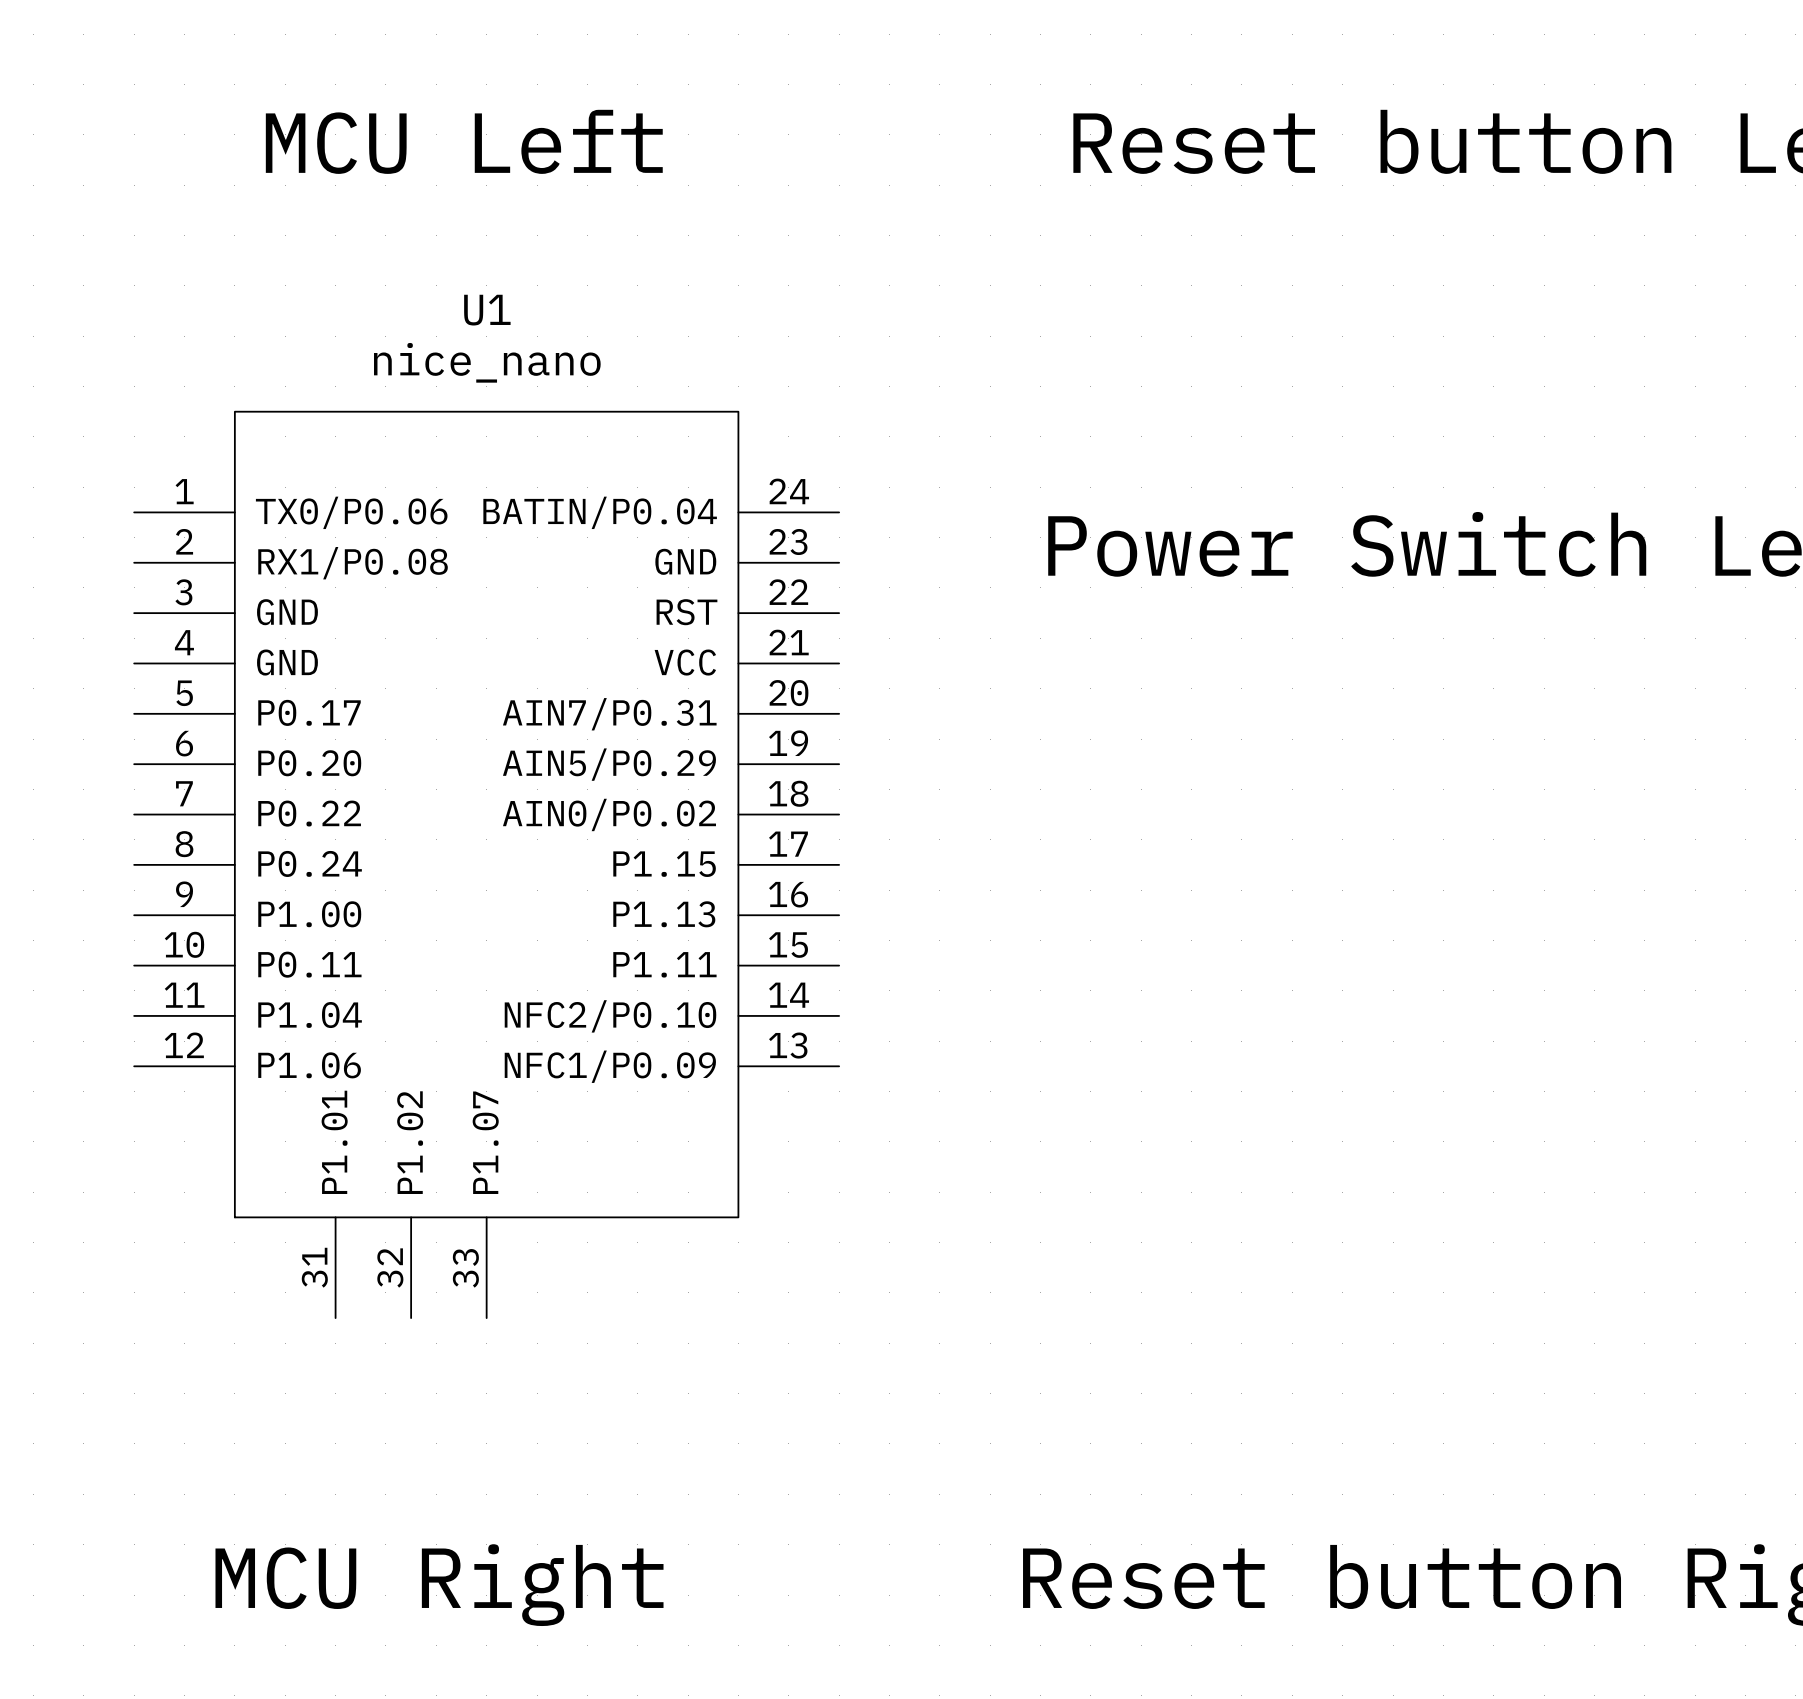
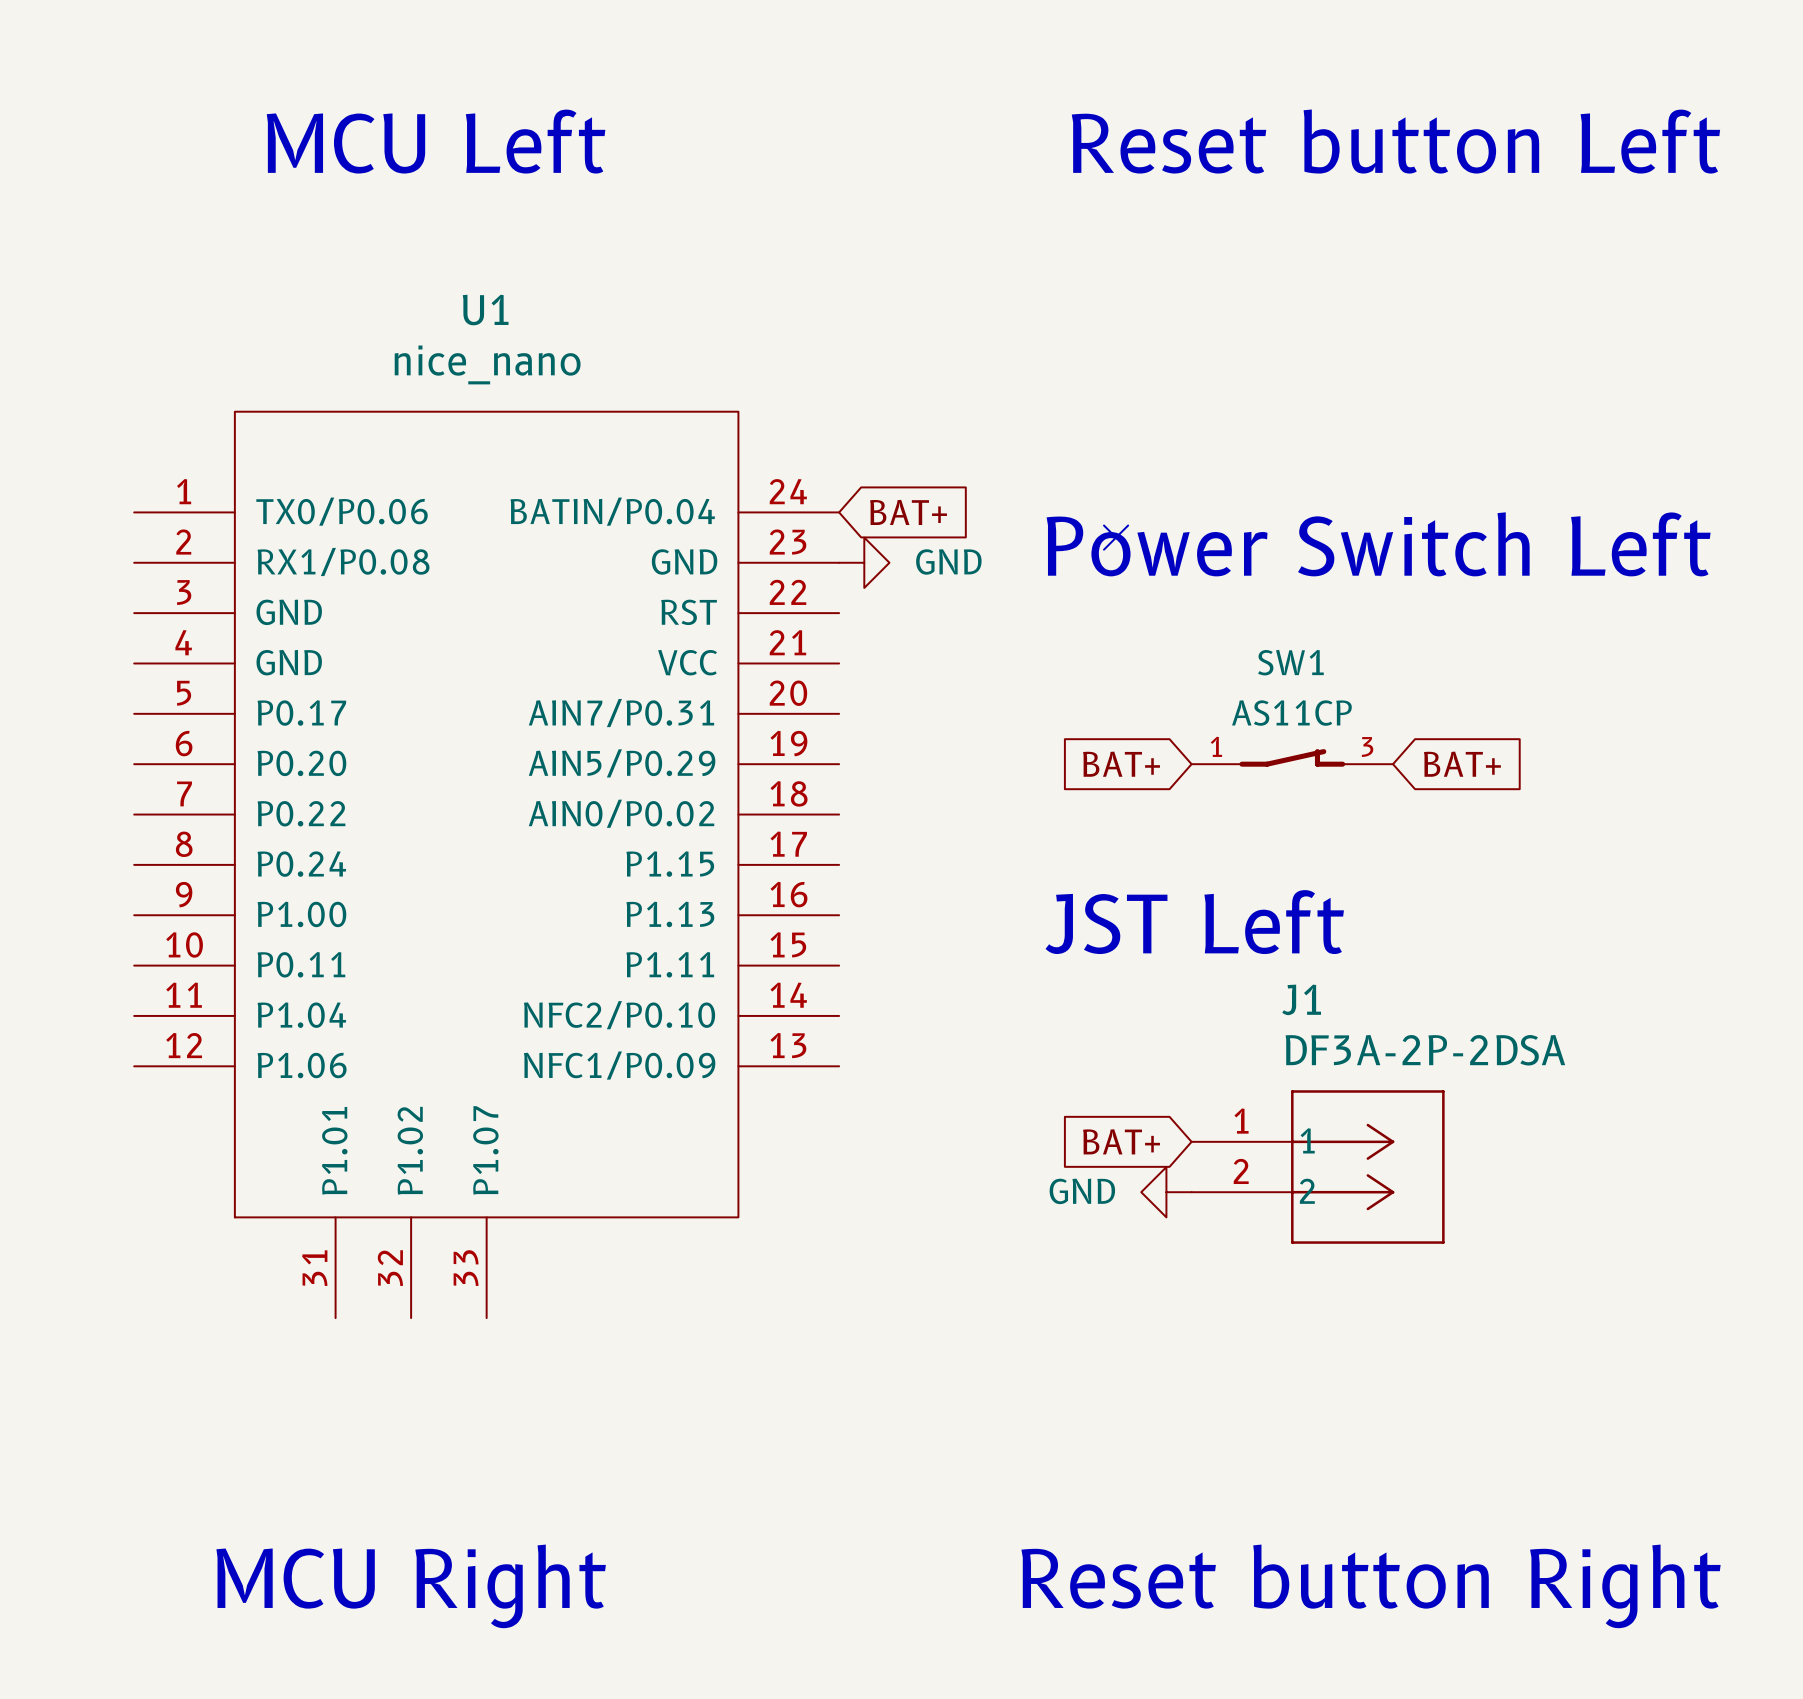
global label: none -> BAT+ (908, 512)
no-connect mark: none -> (1116, 537)
power symbol: none -> GND (864, 562)
SW1: none -> AS11CP (1292, 757)
global label: none -> BAT+ (1121, 764)
global label: none -> BAT+ (1462, 764)
text: none -> JST Left (1194, 922)
global label: none -> BAT+ (1121, 1141)
J1: none -> DF3A-2P-2DSA (1318, 1167)
power symbol: none -> GND (1166, 1192)

